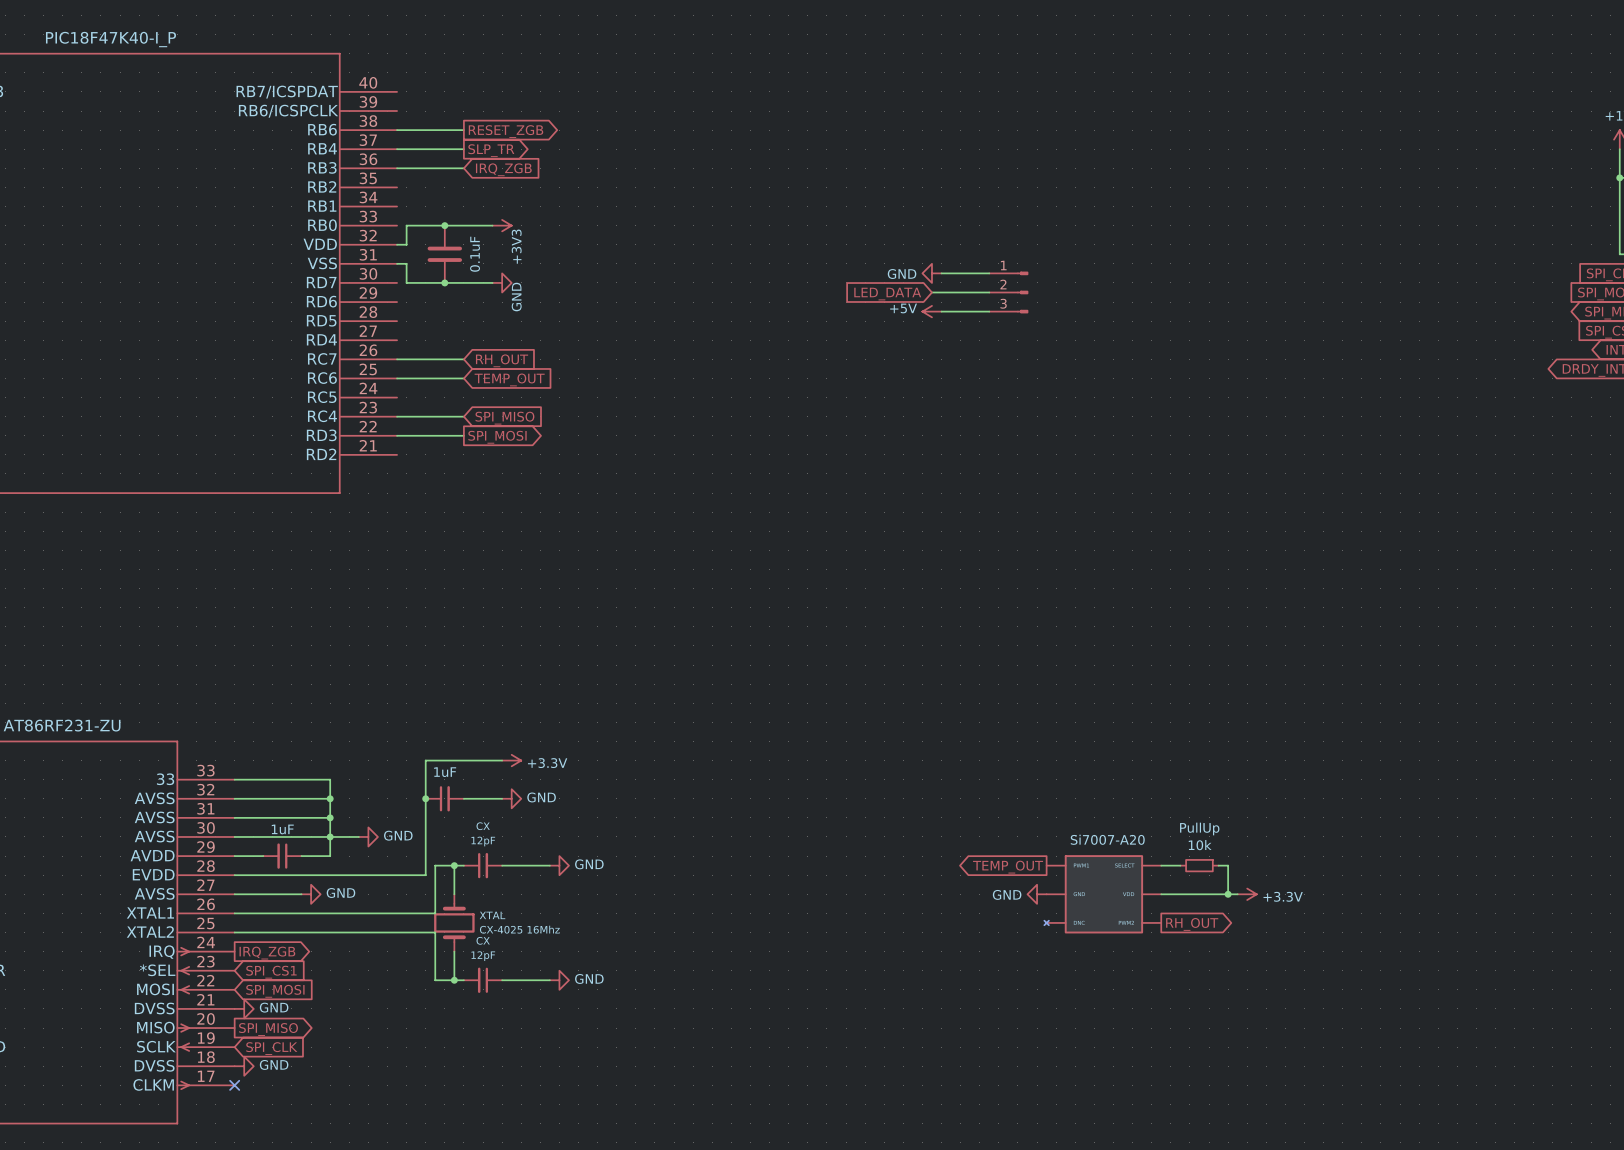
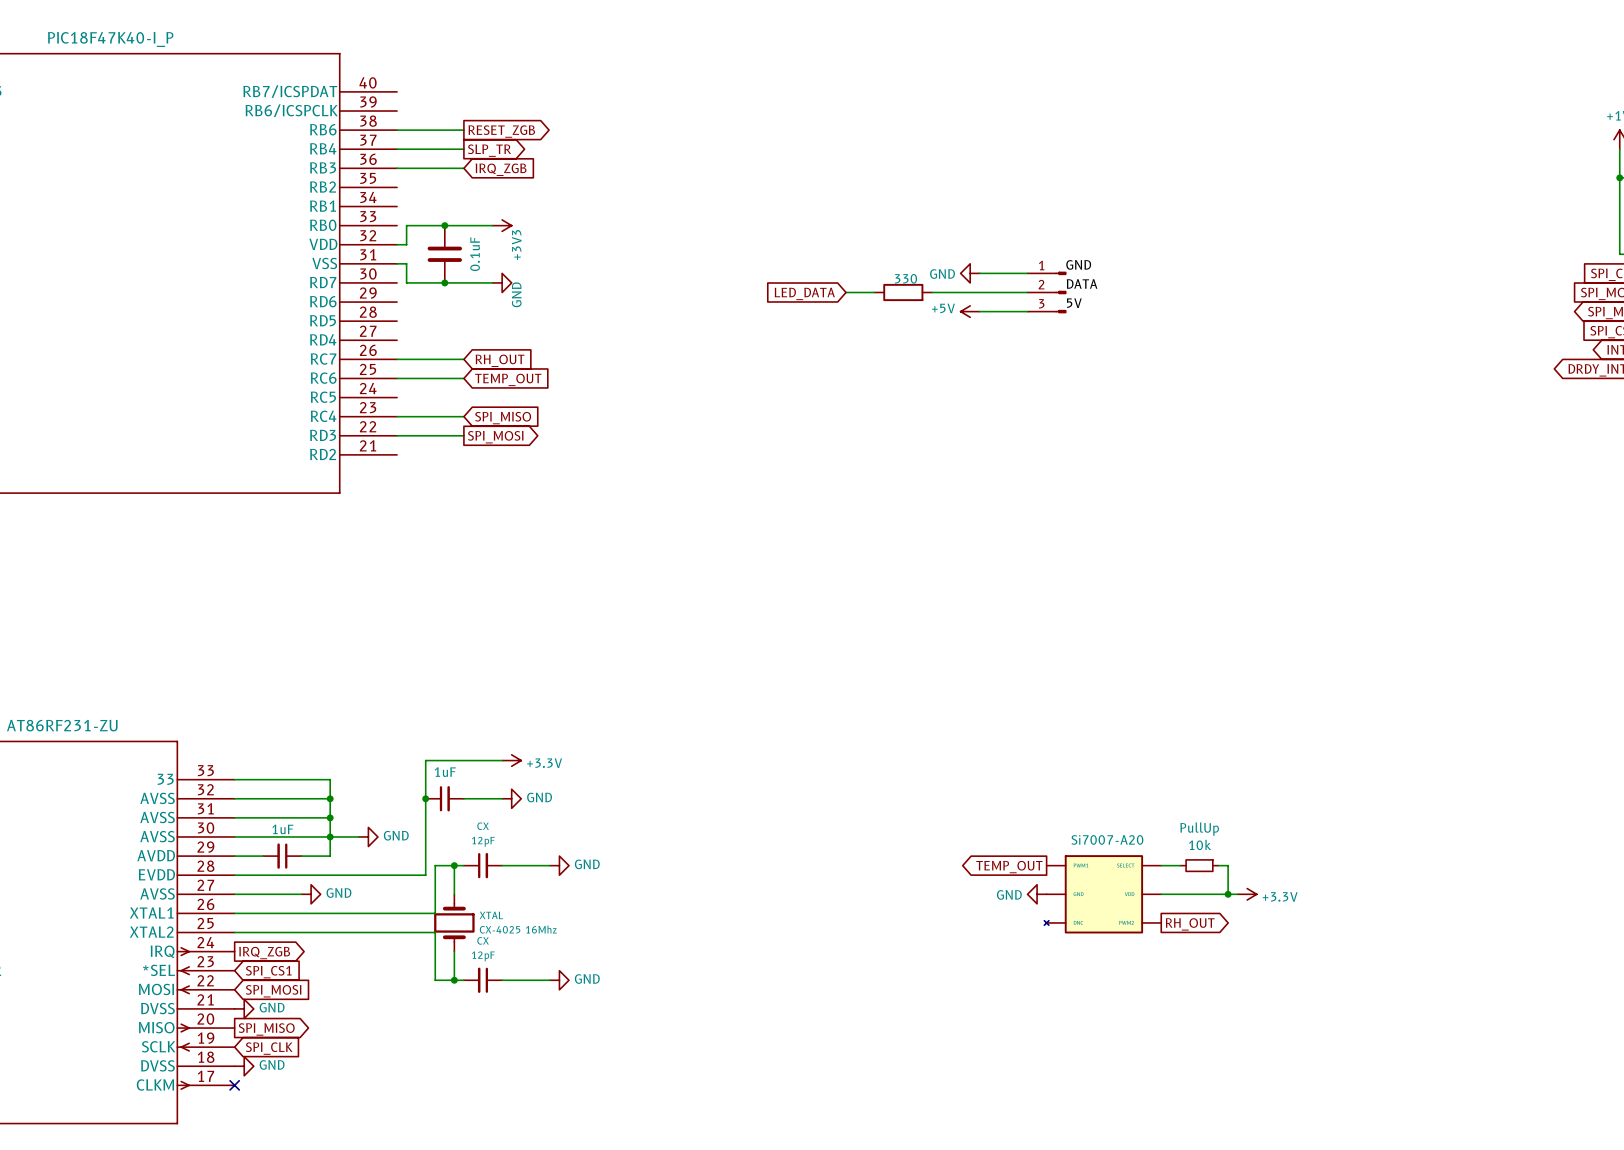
label: none -> GND (1078, 264)
power symbol position: GND (931, 273) -> GND (970, 273)
label: none -> DATA (1082, 283)
wire: none -> (846, 292) (874, 292)
part: none -> 330 (903, 292)
part position: (1008, 292) -> (1046, 292)
global label position: LED_DATA (887, 294) -> LED_DATA (804, 293)
label: none -> 5V (1074, 303)
power symbol position: +5V (931, 311) -> +5V (970, 311)

